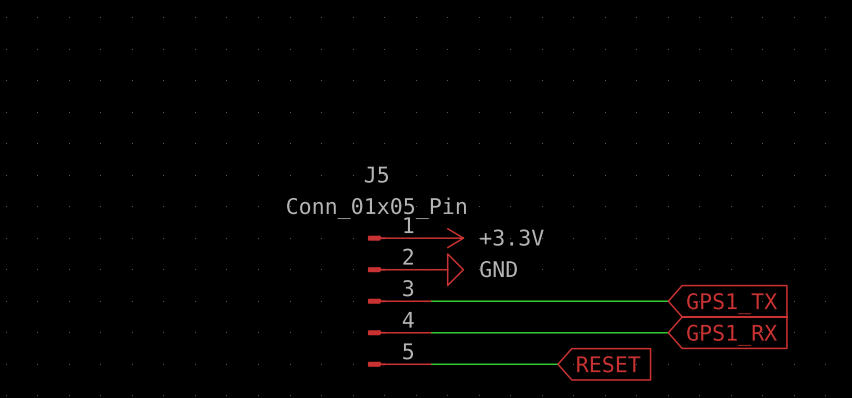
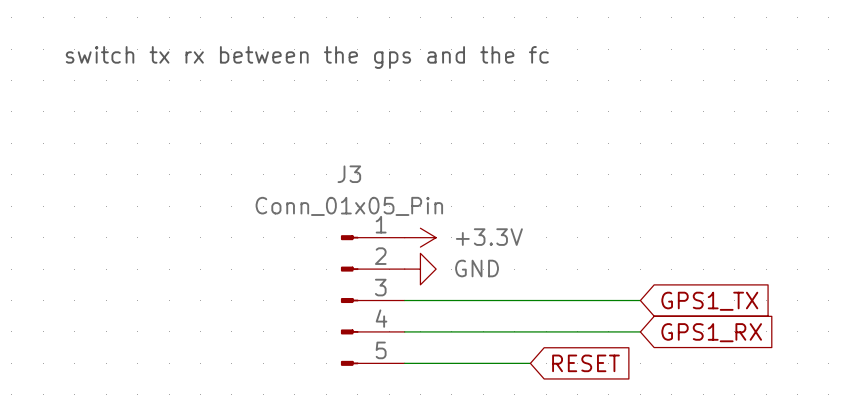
text: none -> switch tx rx between the gps and the fc (307, 57)
J5 name: J5 (376, 174) -> J3 (349, 174)

